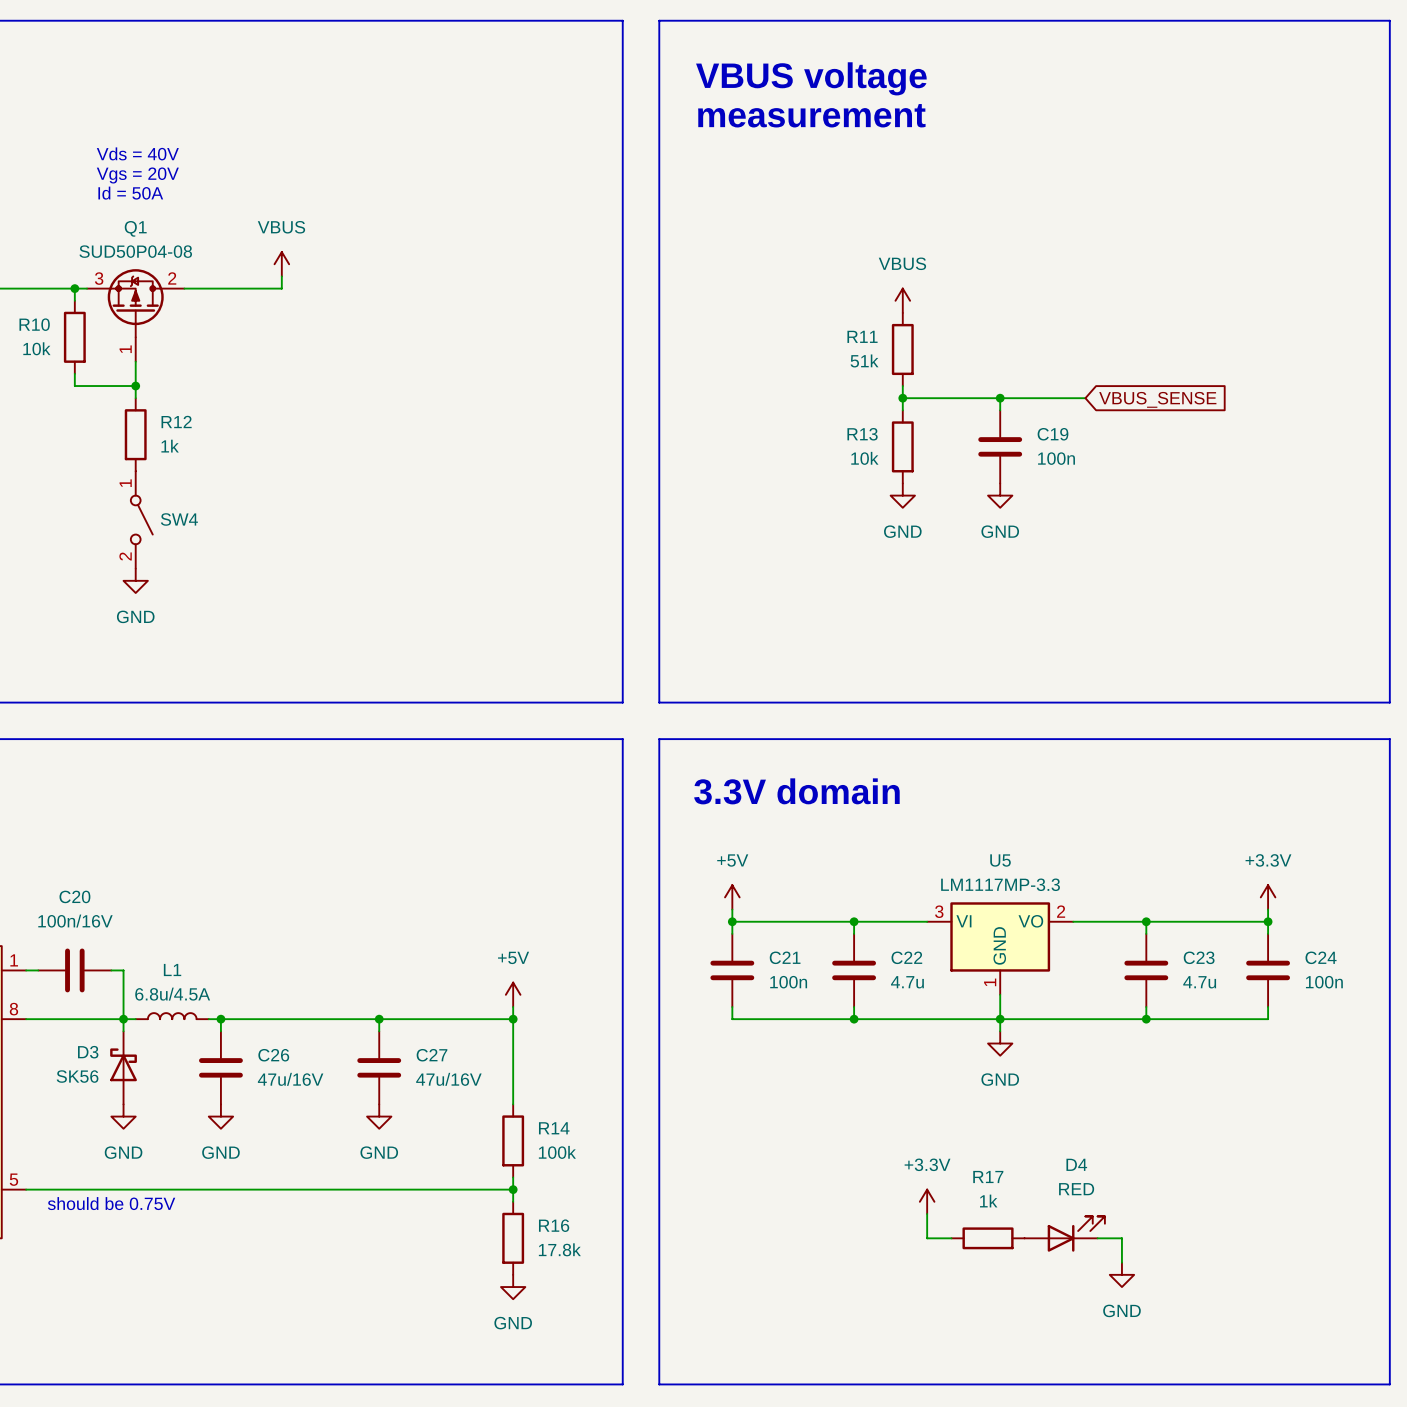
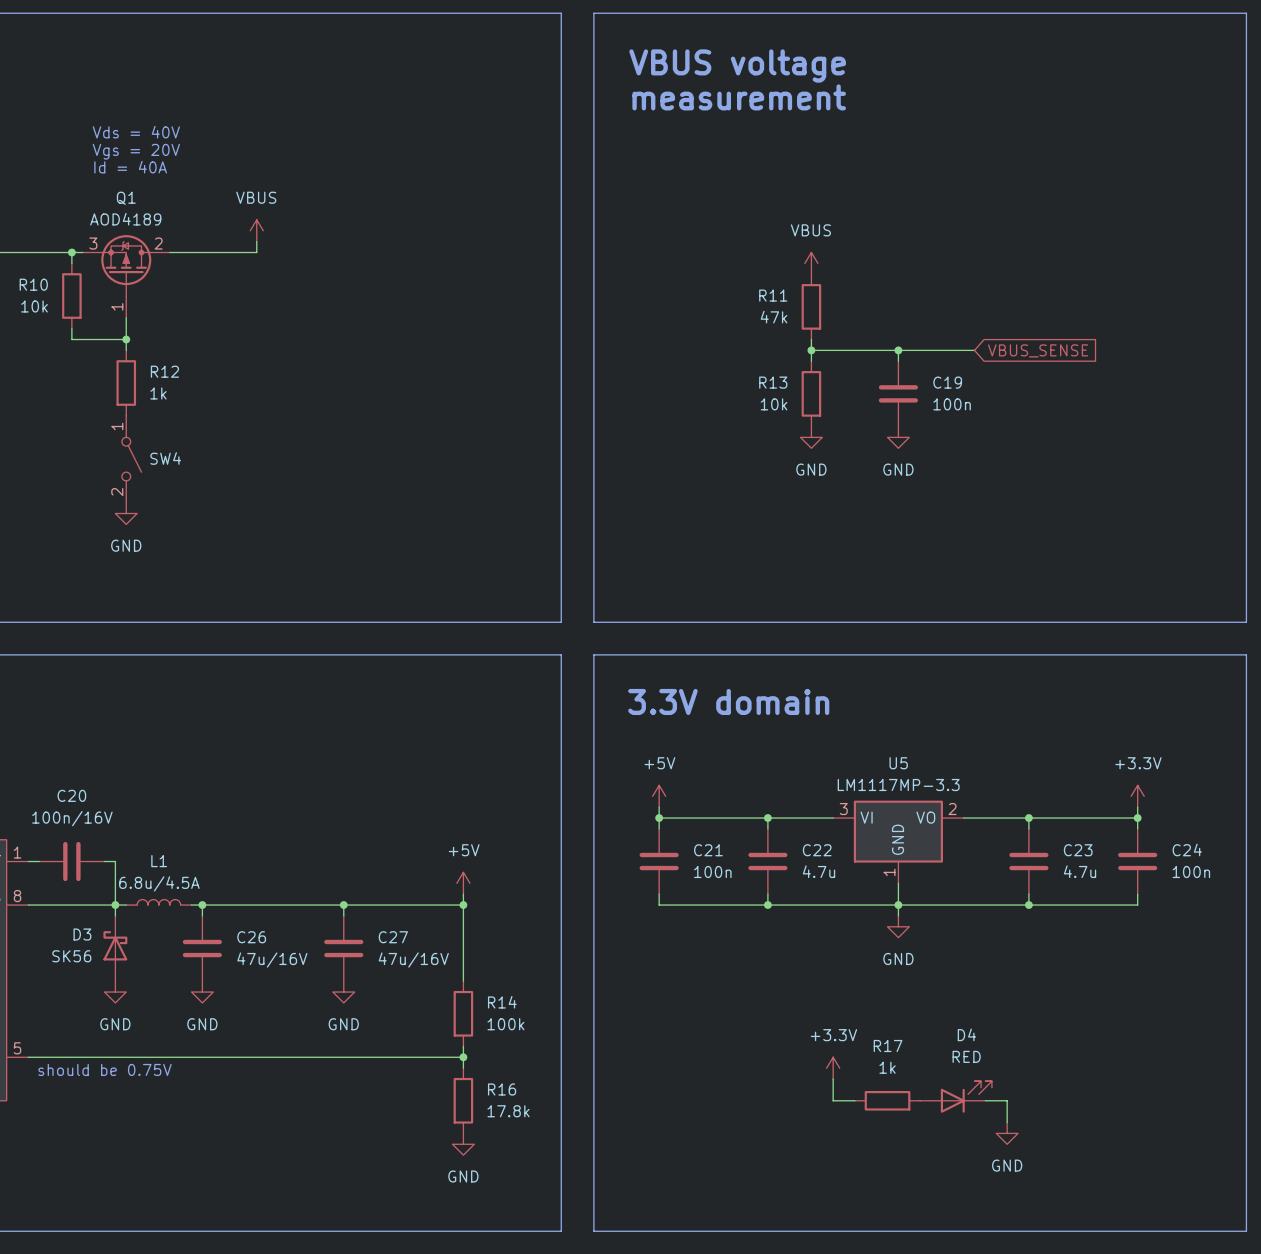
text: Id = 50A (130, 193) -> Id = 40A (130, 167)
Q1 value: SUD50P04-08 (135, 251) -> AOD4189 (125, 219)
R11 value: 51k (864, 360) -> 47k (774, 317)

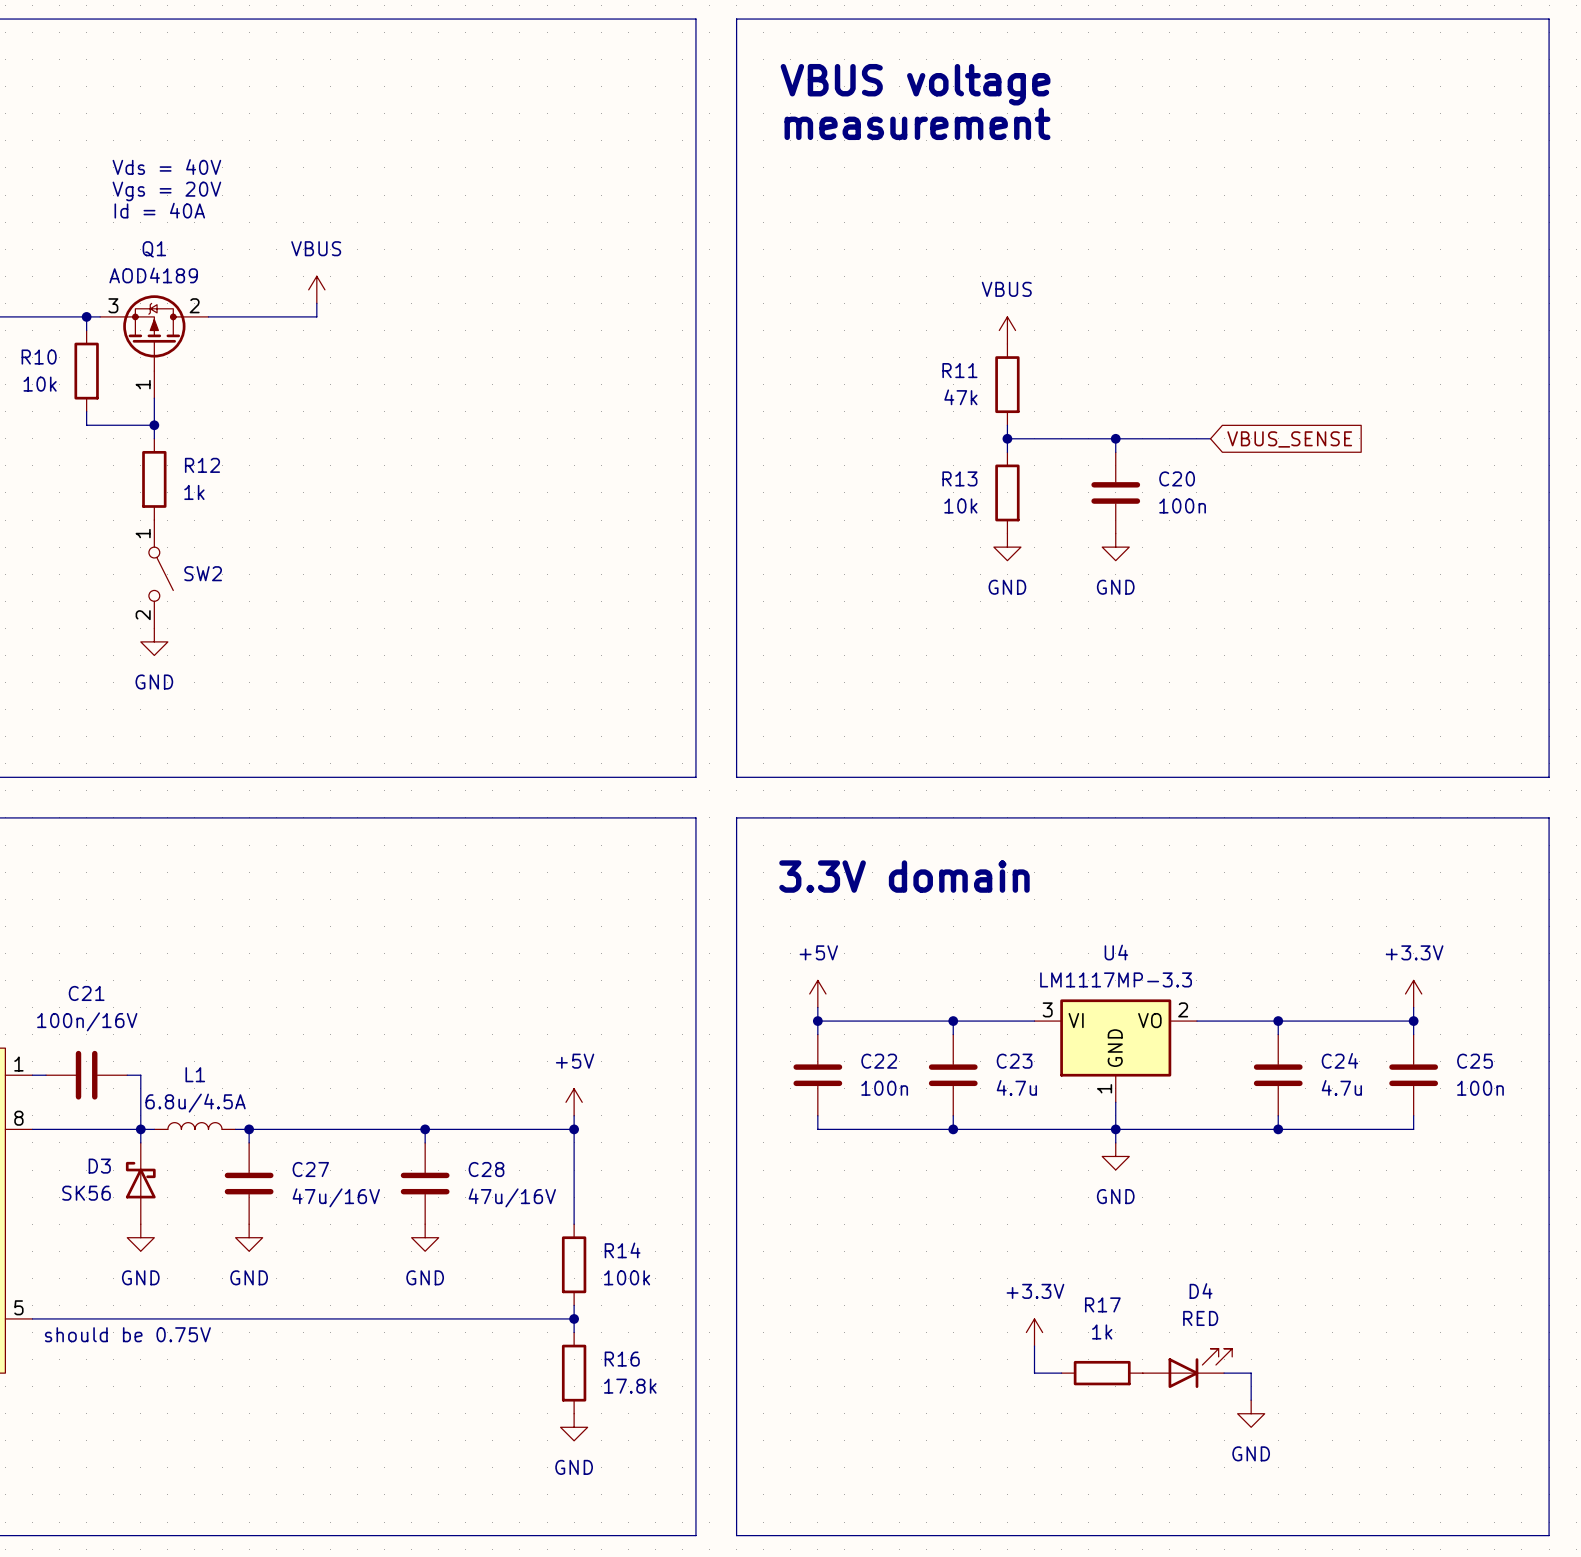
C19 name: C19 (947, 382) -> C20 (1177, 478)
SW4 name: SW4 (165, 458) -> SW2 (203, 573)
U5 name: U5 (898, 763) -> U4 (1116, 952)
C20 name: C20 (71, 795) -> C21 (86, 993)
C24 name: C24 (1187, 849) -> C25 (1475, 1061)
C21 name: C21 (708, 850) -> C22 (879, 1061)
C22 name: C22 (817, 850) -> C23 (1014, 1061)
C23 name: C23 (1078, 850) -> C24 (1339, 1060)
C26 name: C26 (251, 937) -> C27 (310, 1169)
C27 name: C27 (393, 937) -> C28 (486, 1169)

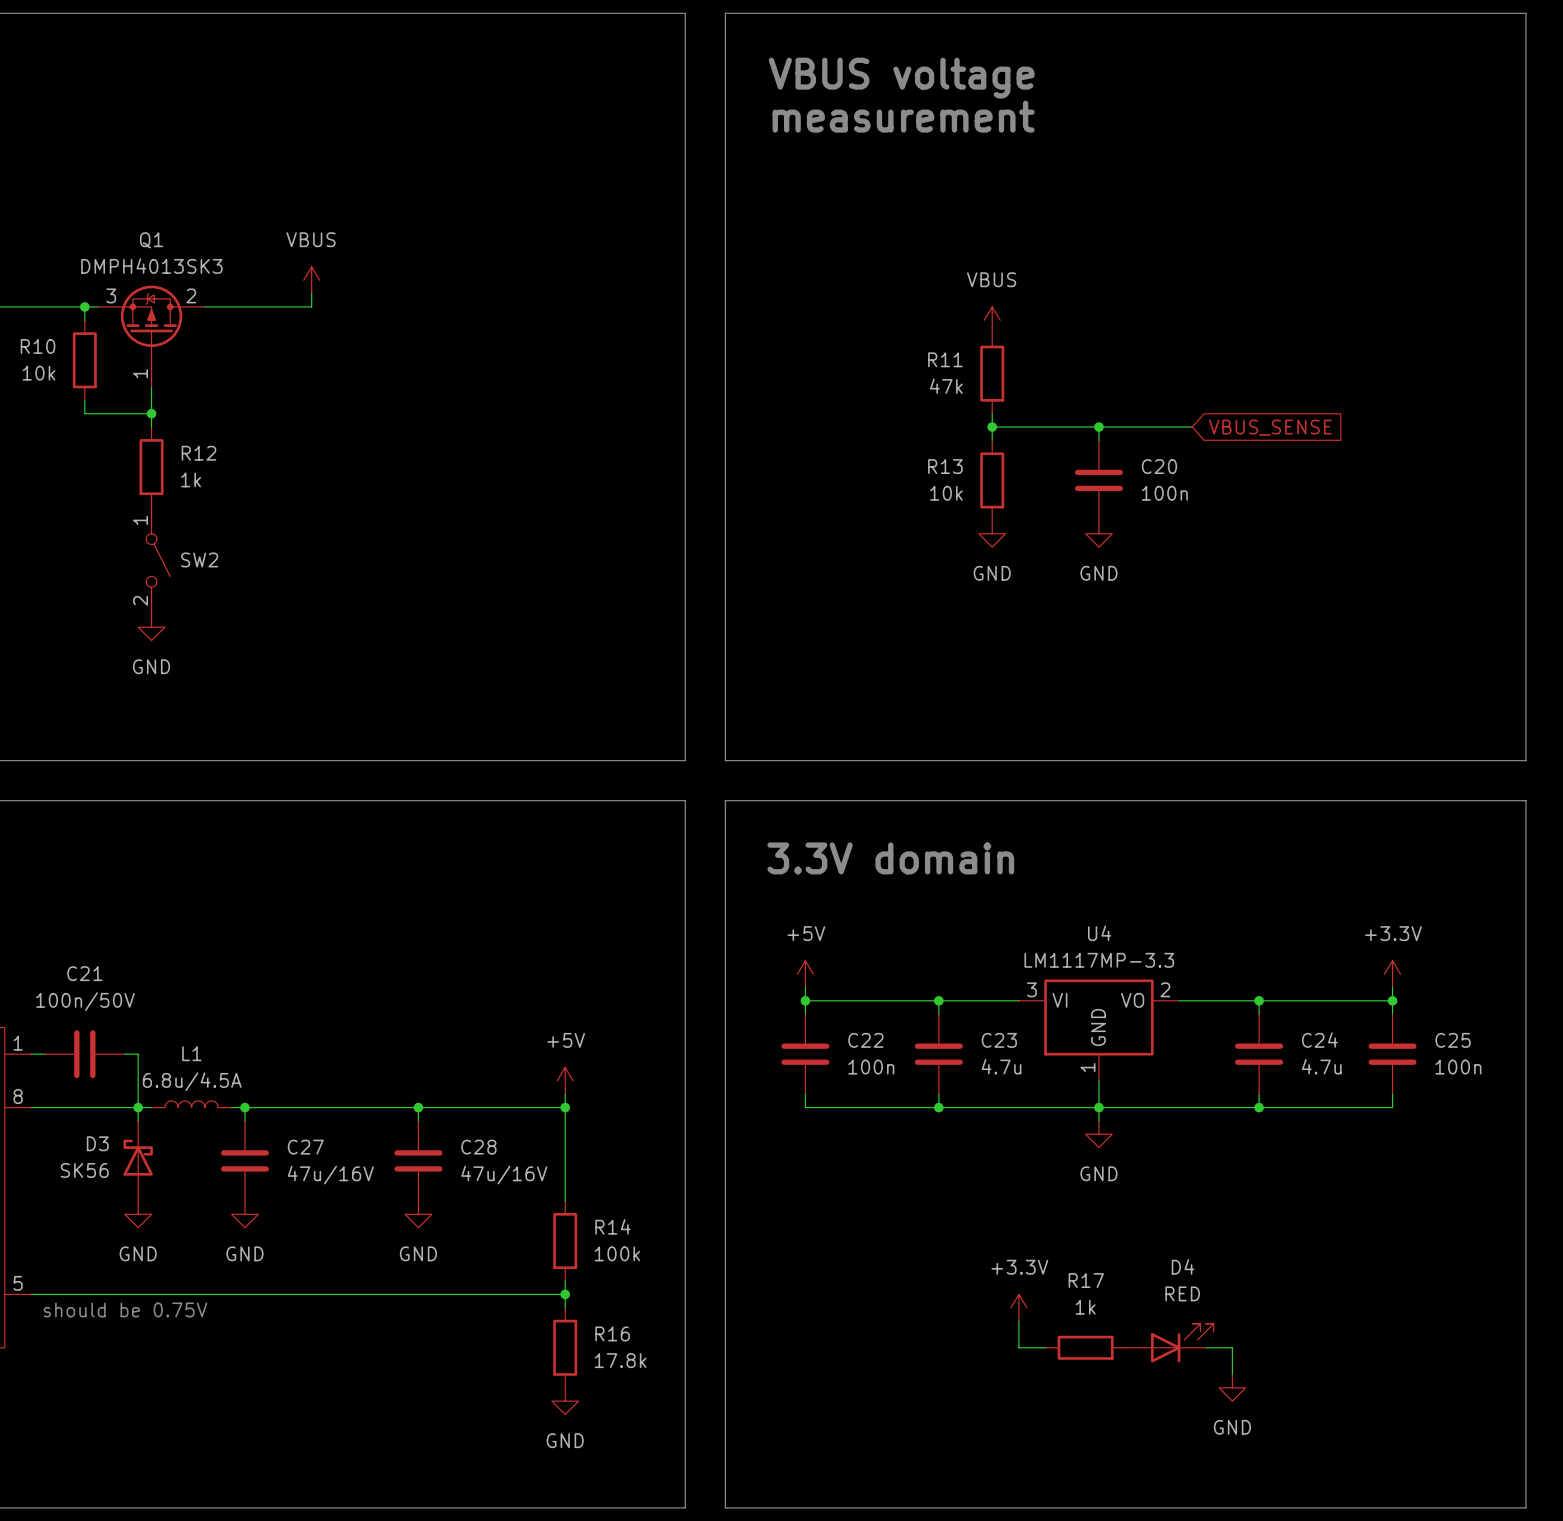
text: Vds = 40V (166, 167) -> none
text: Vgs = 20V (166, 191) -> none
text: Id = 40A (159, 210) -> none
Q1 value: AOD4189 (153, 275) -> DMPH4013SK3 (151, 266)
C21 value: 100n/16V (87, 1021) -> 100n/50V (85, 1001)

